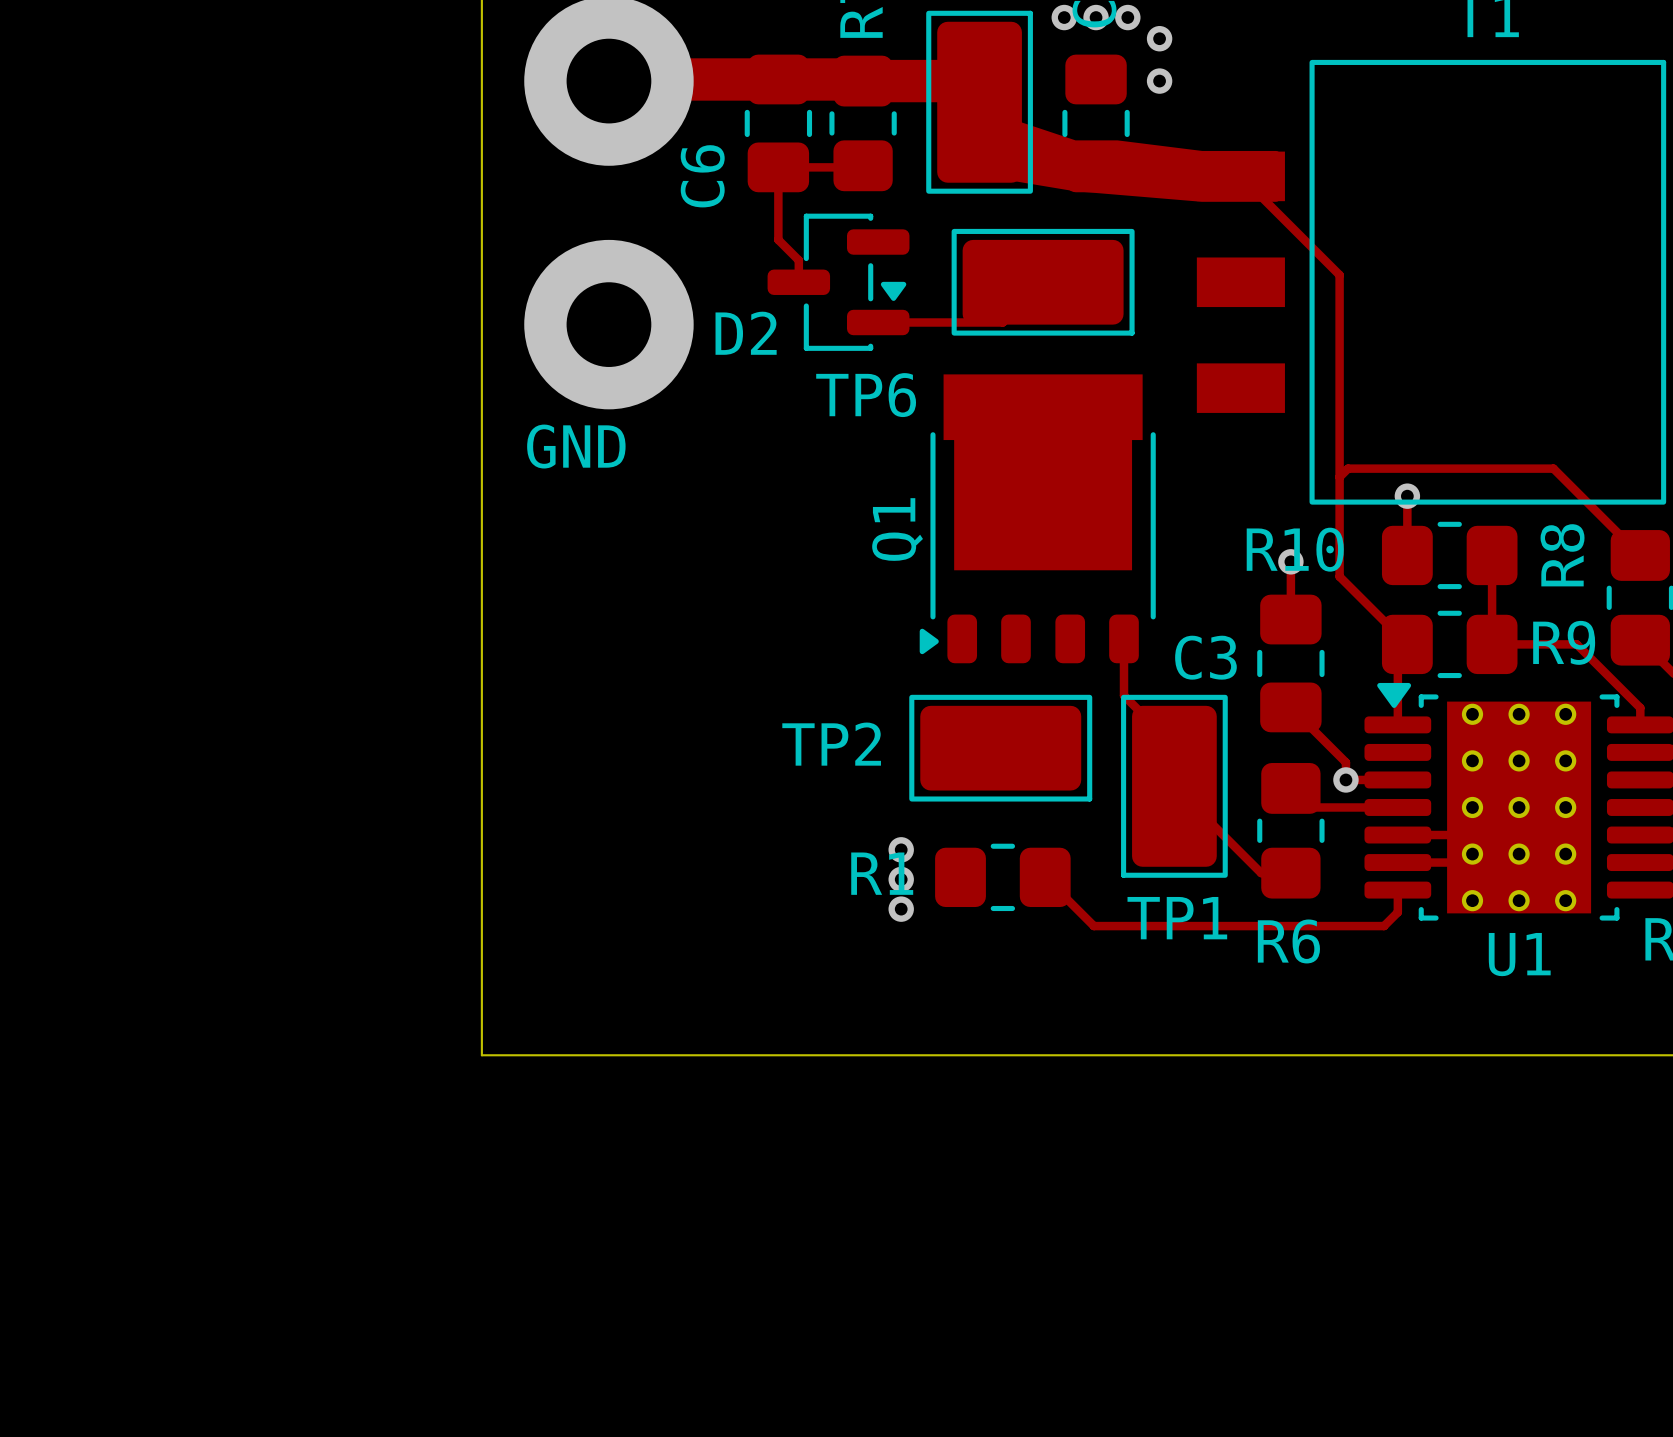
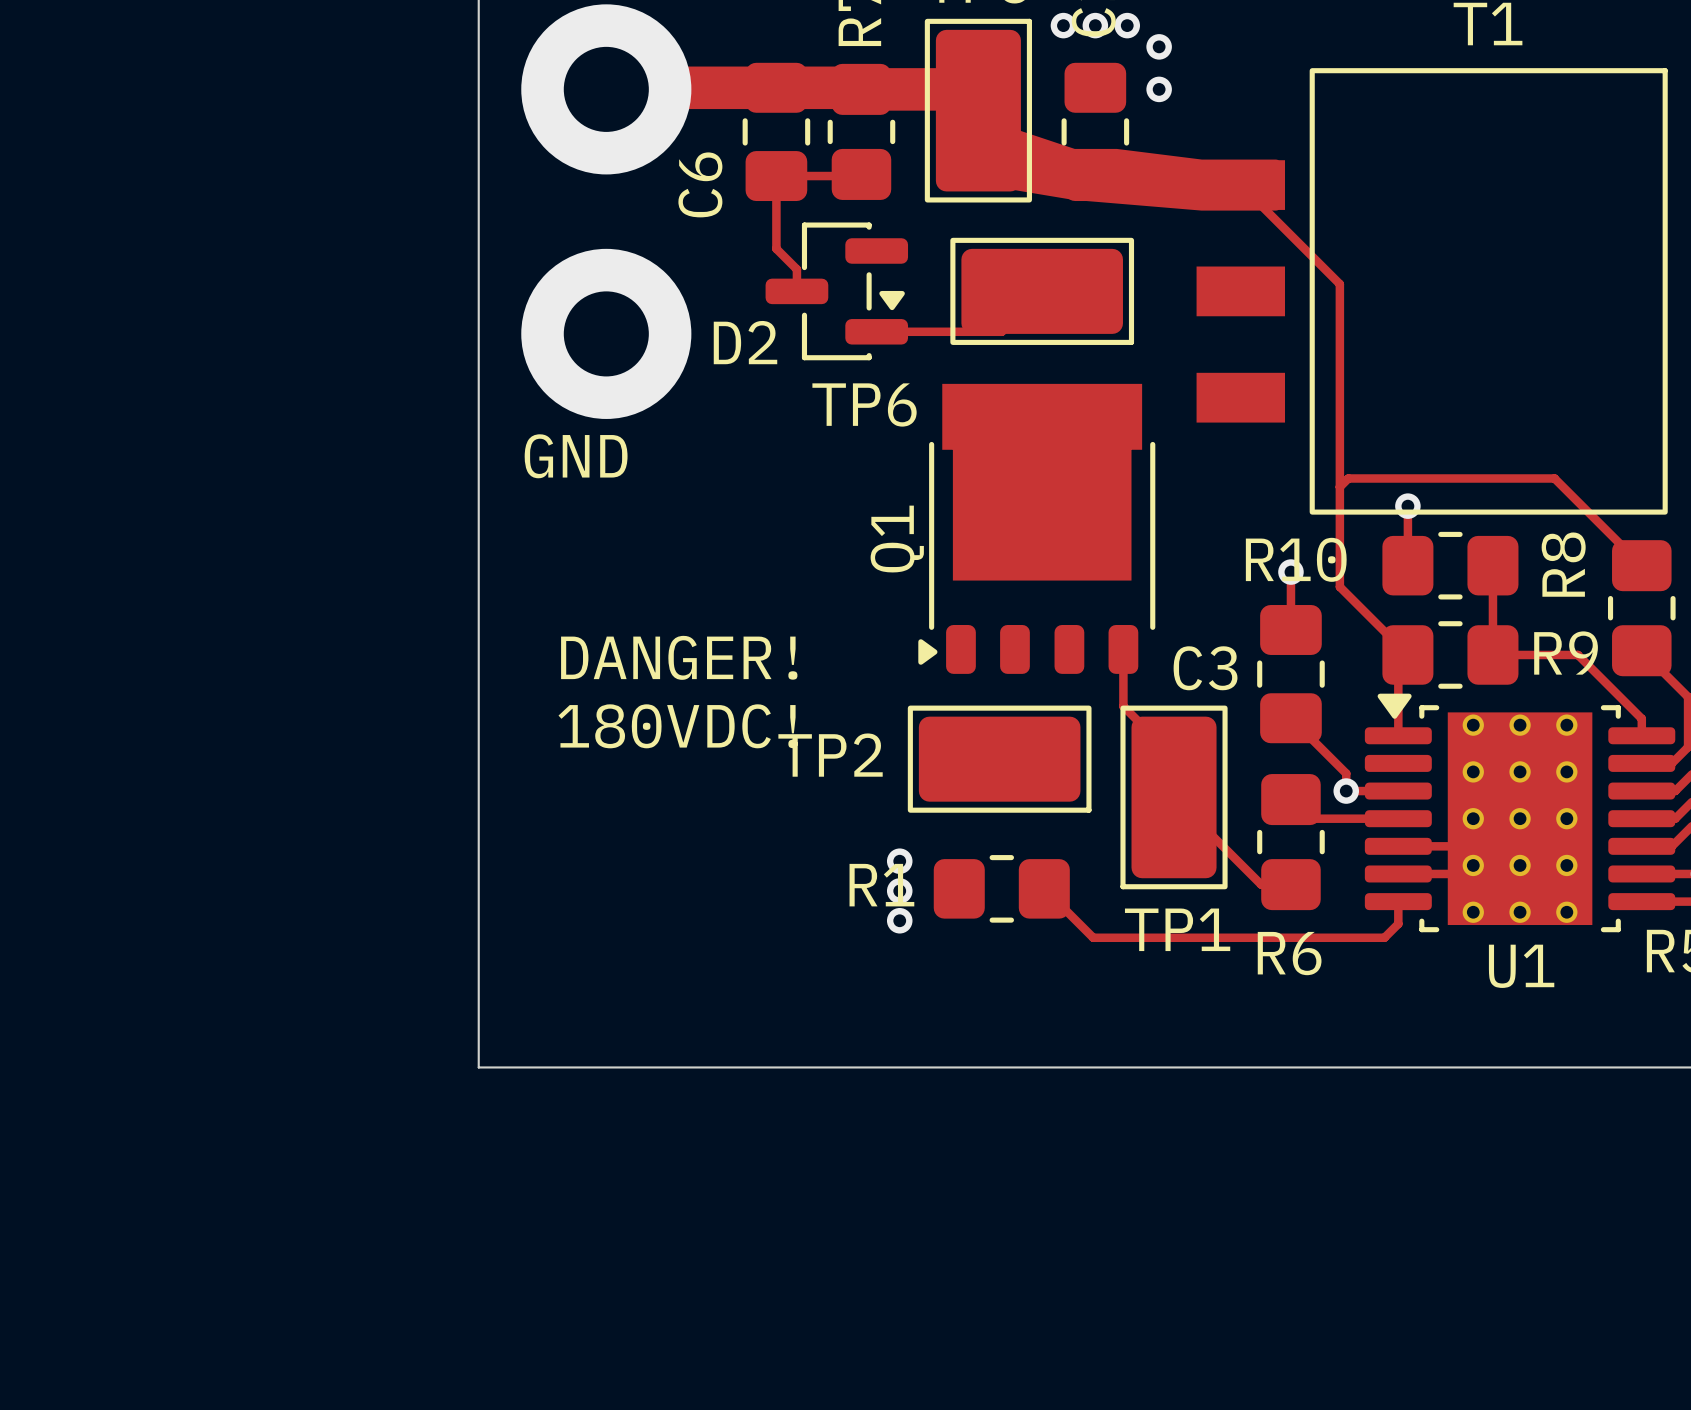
text: none -> DANGER! (679, 657)
text: none -> 180VDC! (677, 726)

